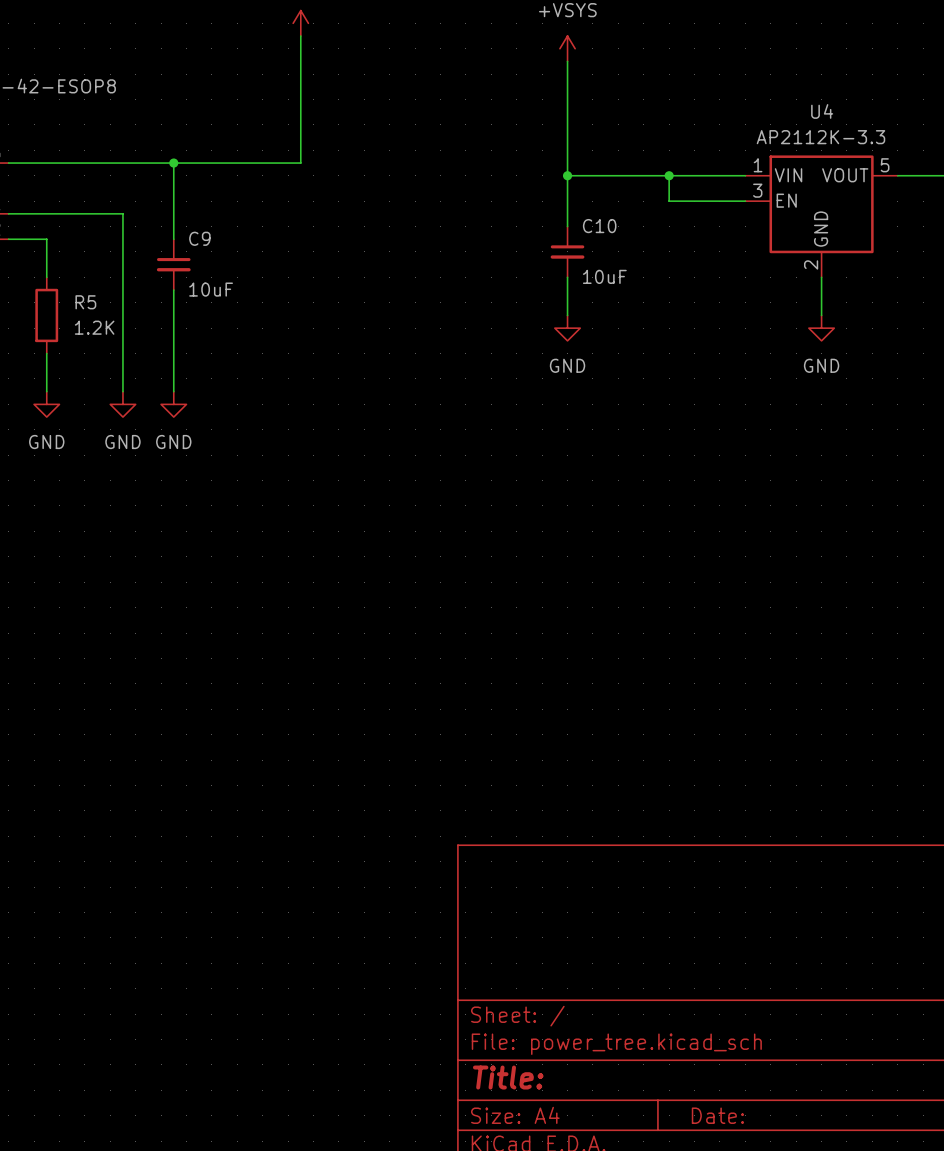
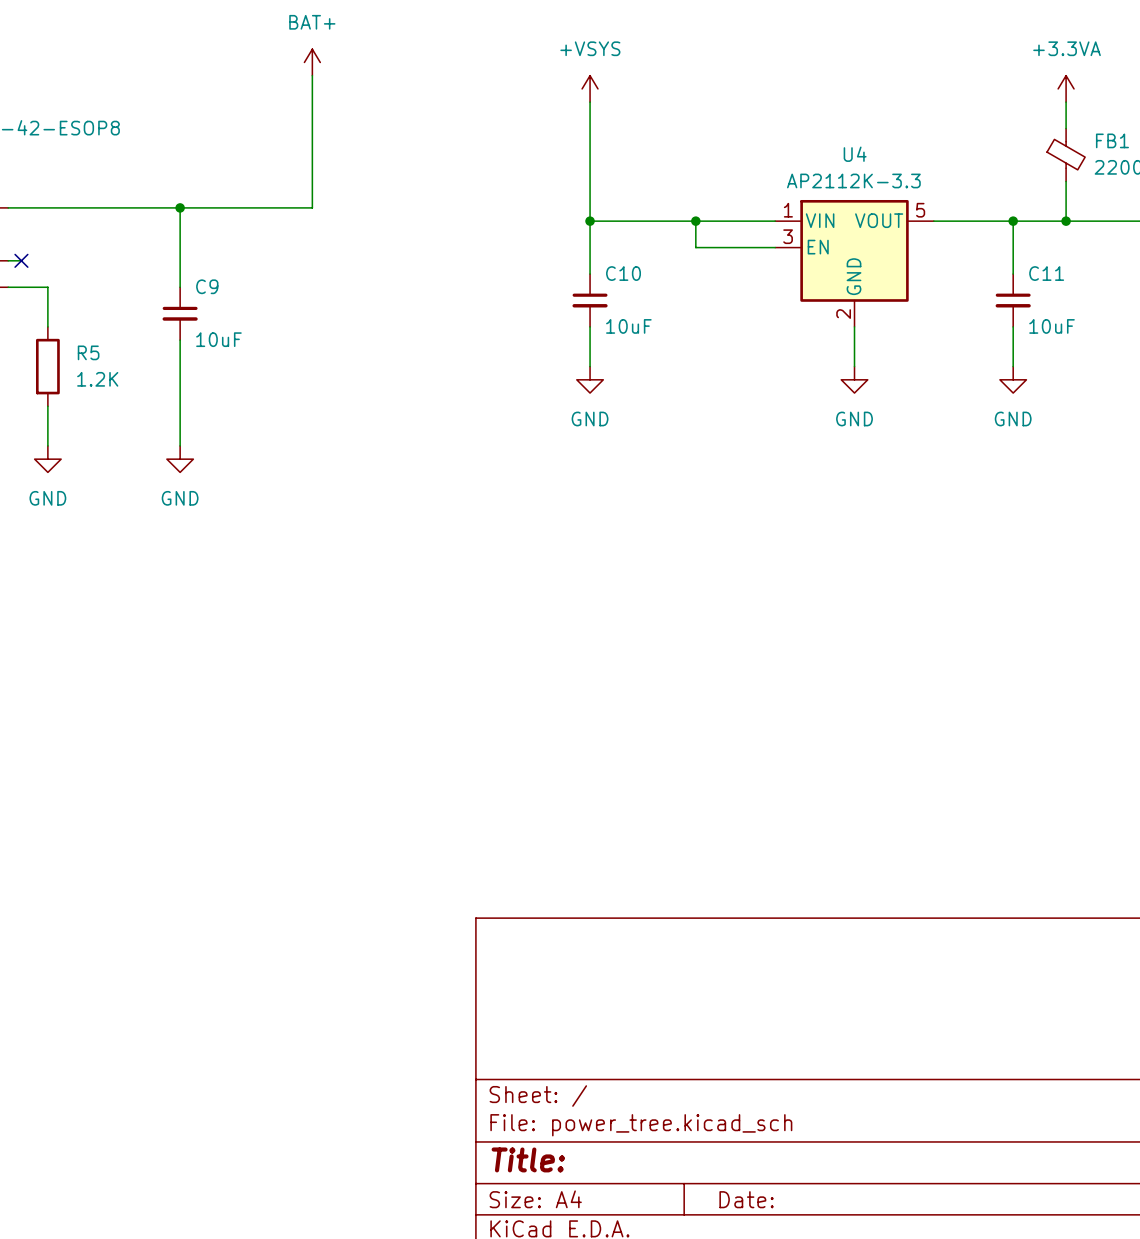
wire: (21, 213) (122, 213) (122, 391) -> none
no-connect mark: none -> (21, 260)
power symbol: GND (122, 404) -> none

